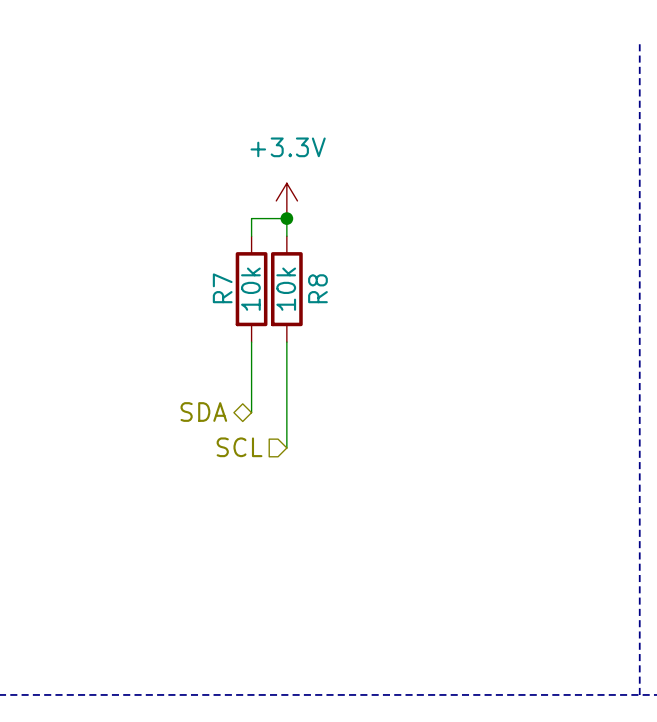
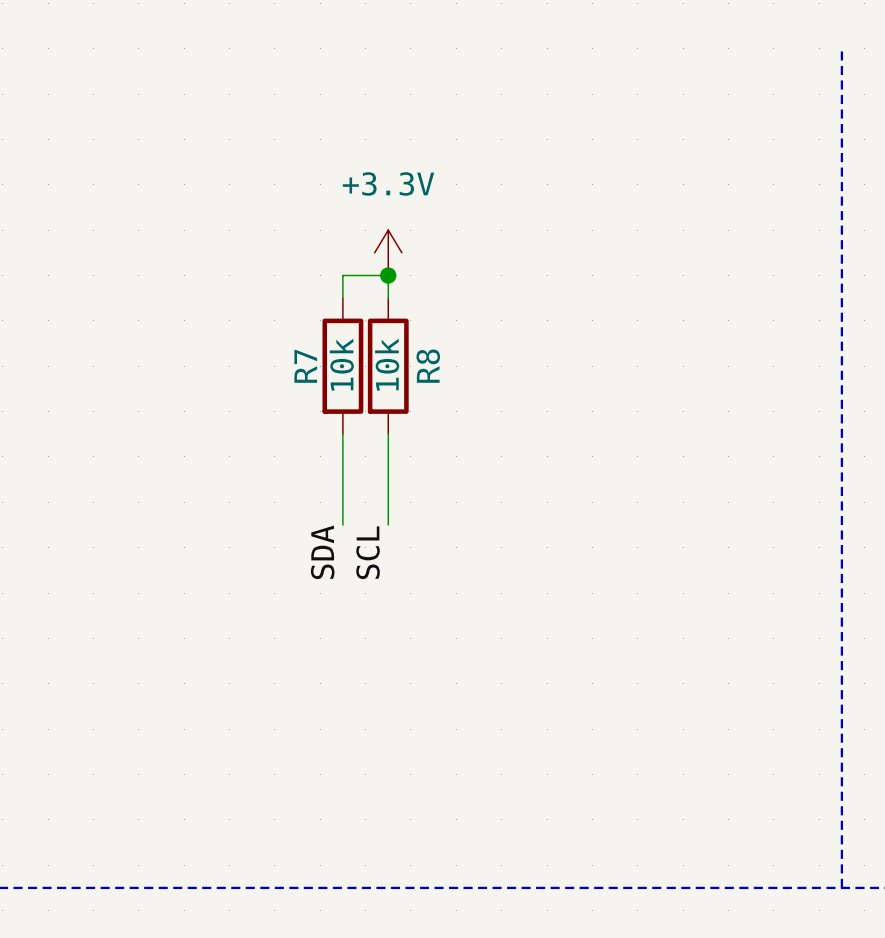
hierarchical label: SDA (203, 412) -> none
wire: (286, 412) (286, 447) -> none
label: none -> SCL (368, 552)
label: none -> SDA (322, 552)
hierarchical label: SCL (239, 447) -> none

